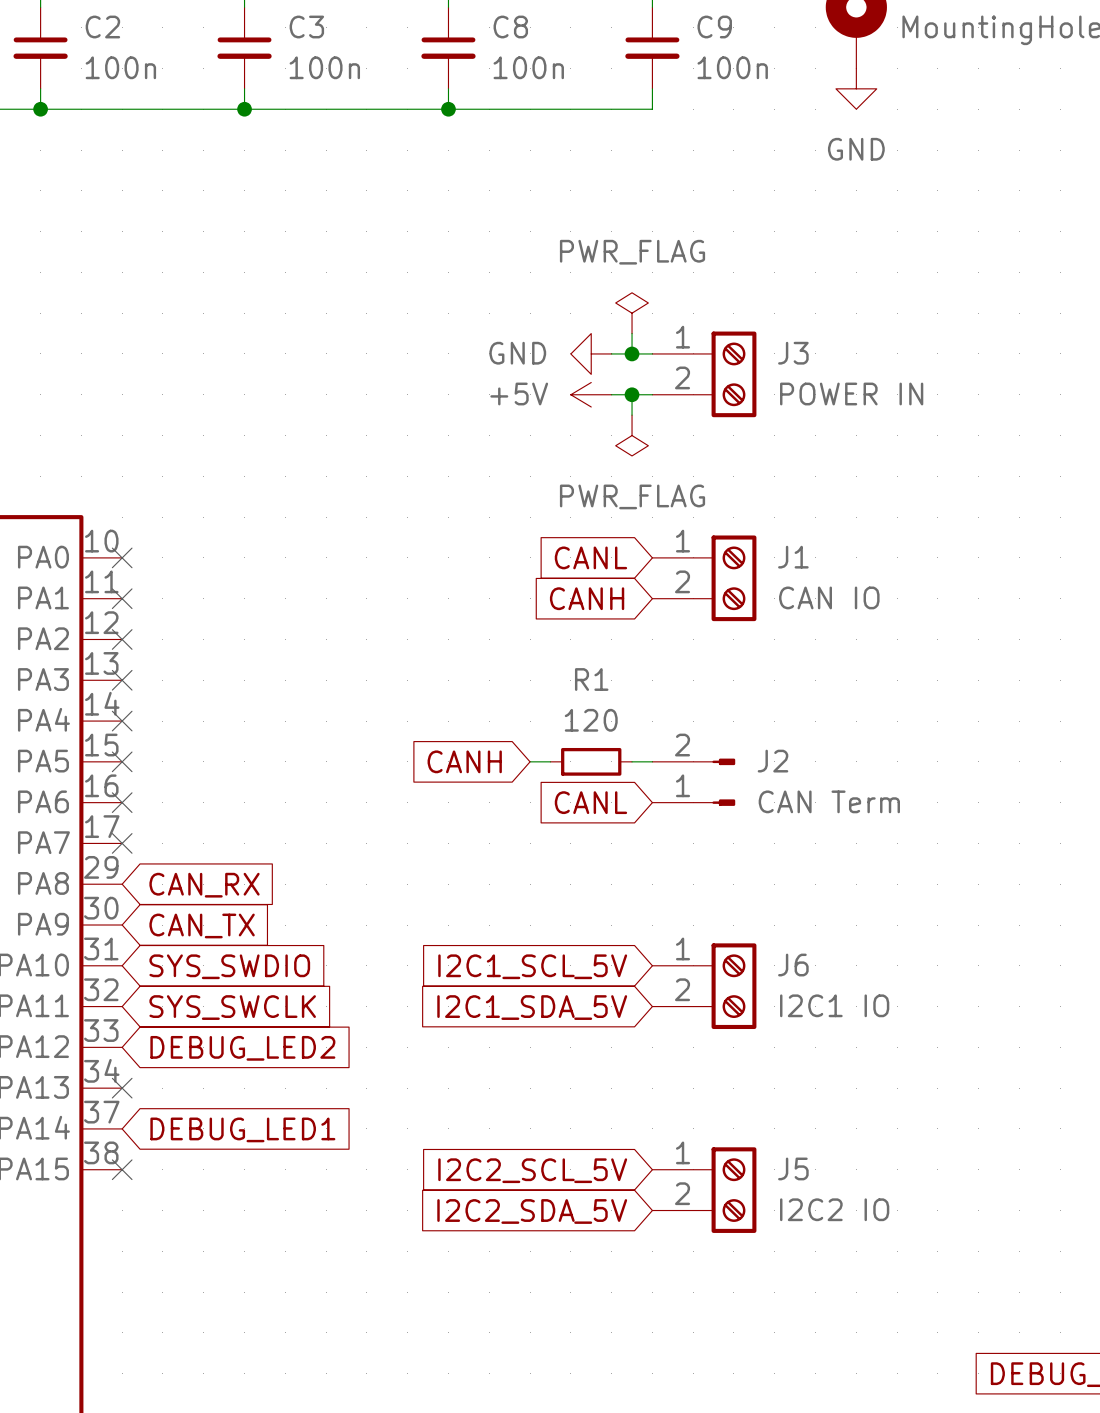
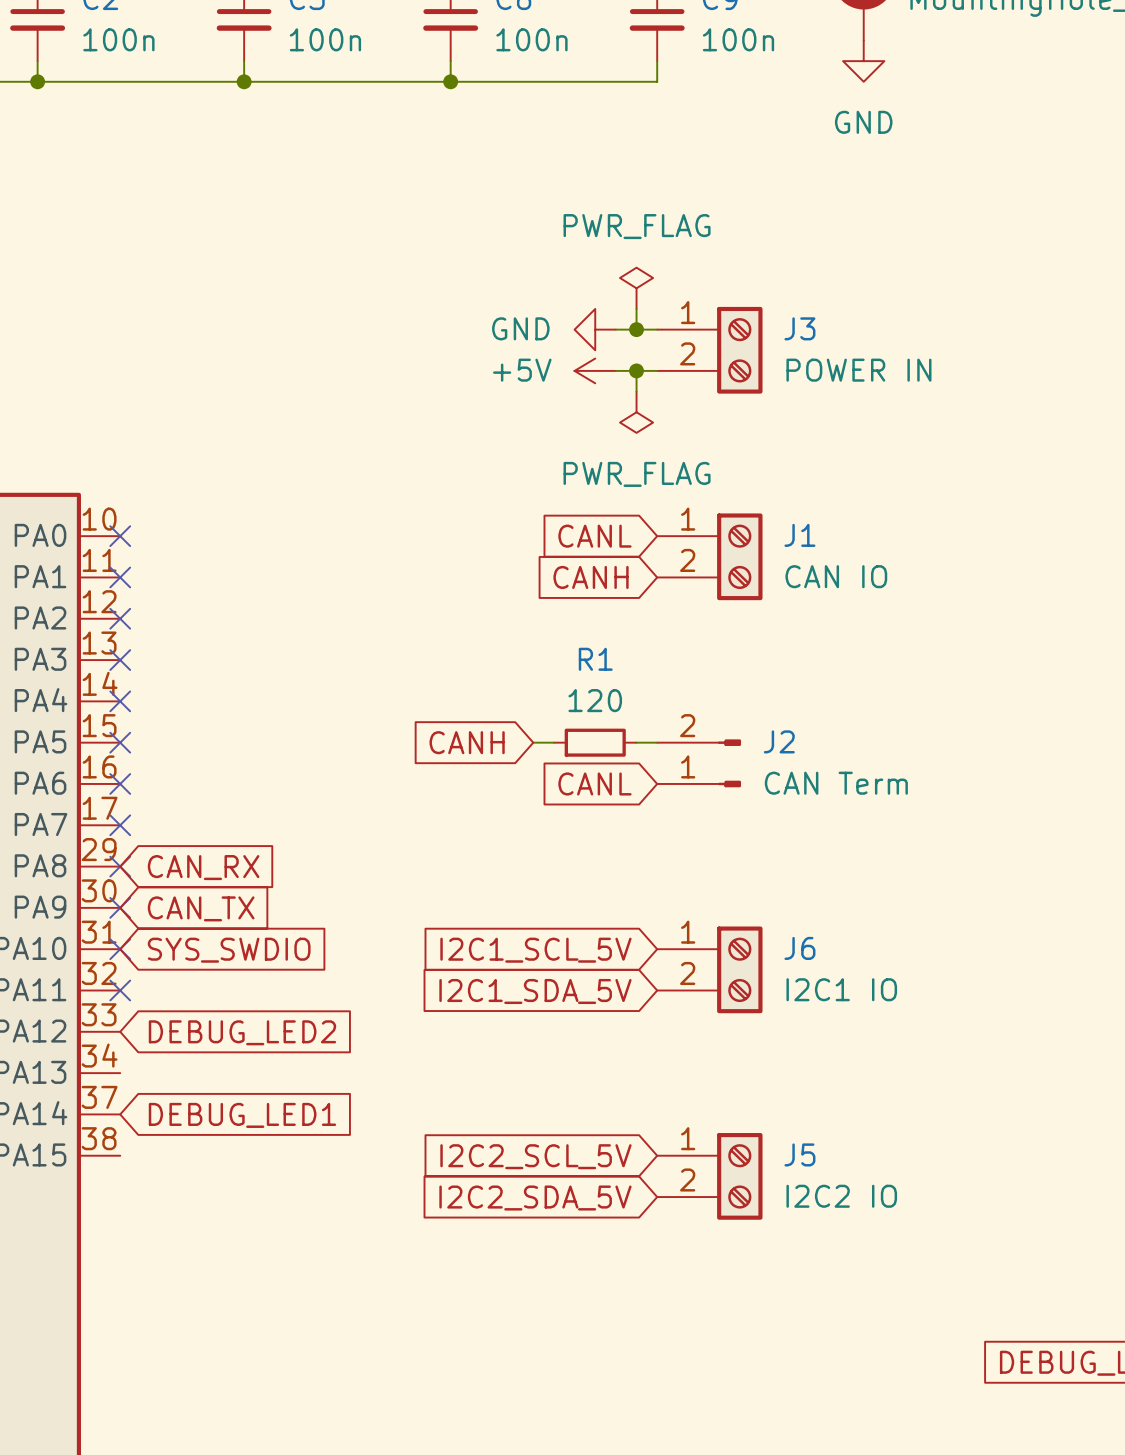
no-connect mark: none -> (120, 866)
no-connect mark: none -> (120, 907)
no-connect mark: none -> (120, 949)
no-connect mark: none -> (120, 990)
global label: SYS_SWCLK (232, 1007) -> none
no-connect mark: (122, 1088) -> none
no-connect mark: (122, 1169) -> none

